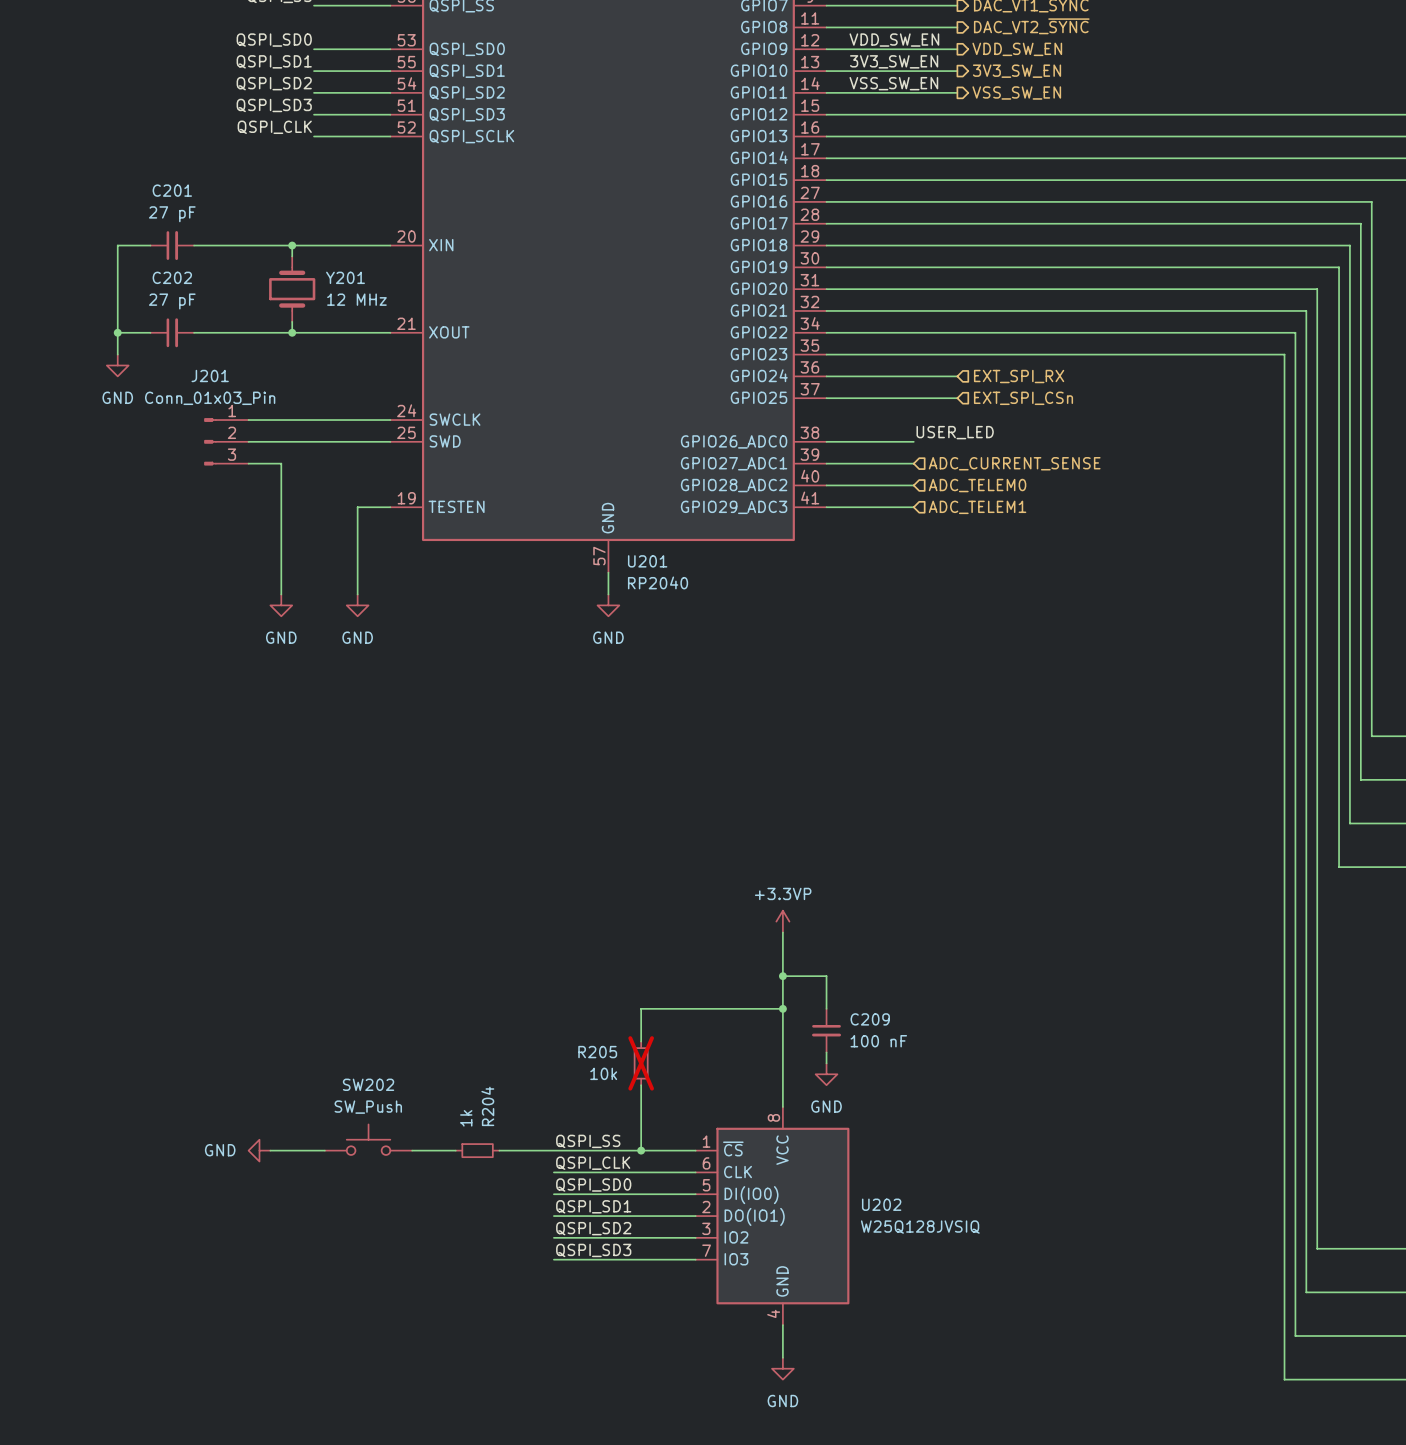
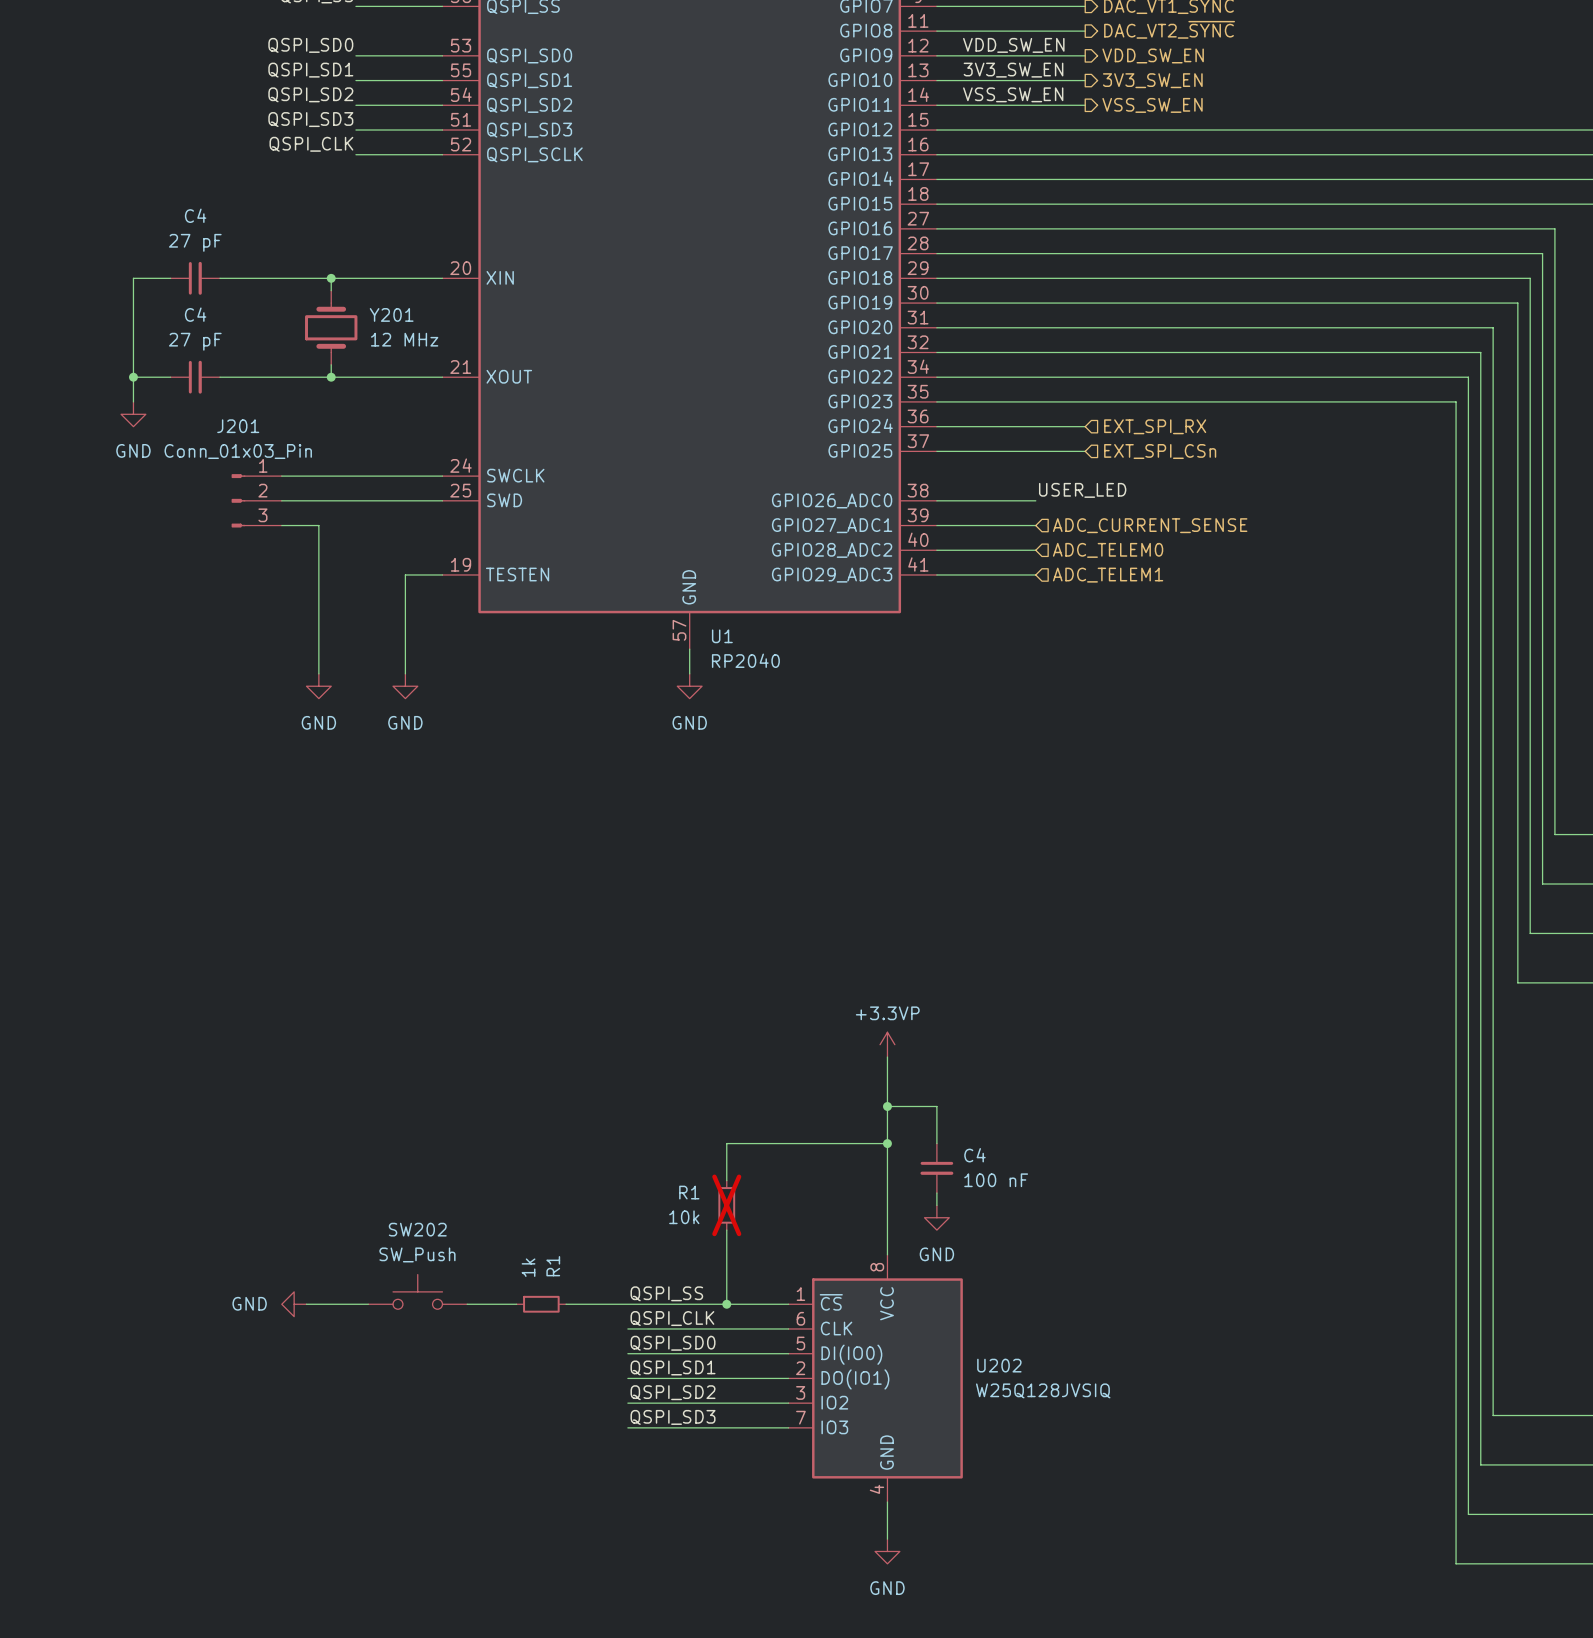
C201 name: C201 (172, 190) -> C4 (195, 215)
C202 name: C202 (172, 277) -> C4 (195, 314)
U201 name: U201 (647, 561) -> U1 (722, 636)
C209 name: C209 (870, 1019) -> C4 (974, 1155)
R205 name: R205 (597, 1052) -> R1 (689, 1192)
R204 name: R204 (487, 1106) -> R1 (553, 1266)

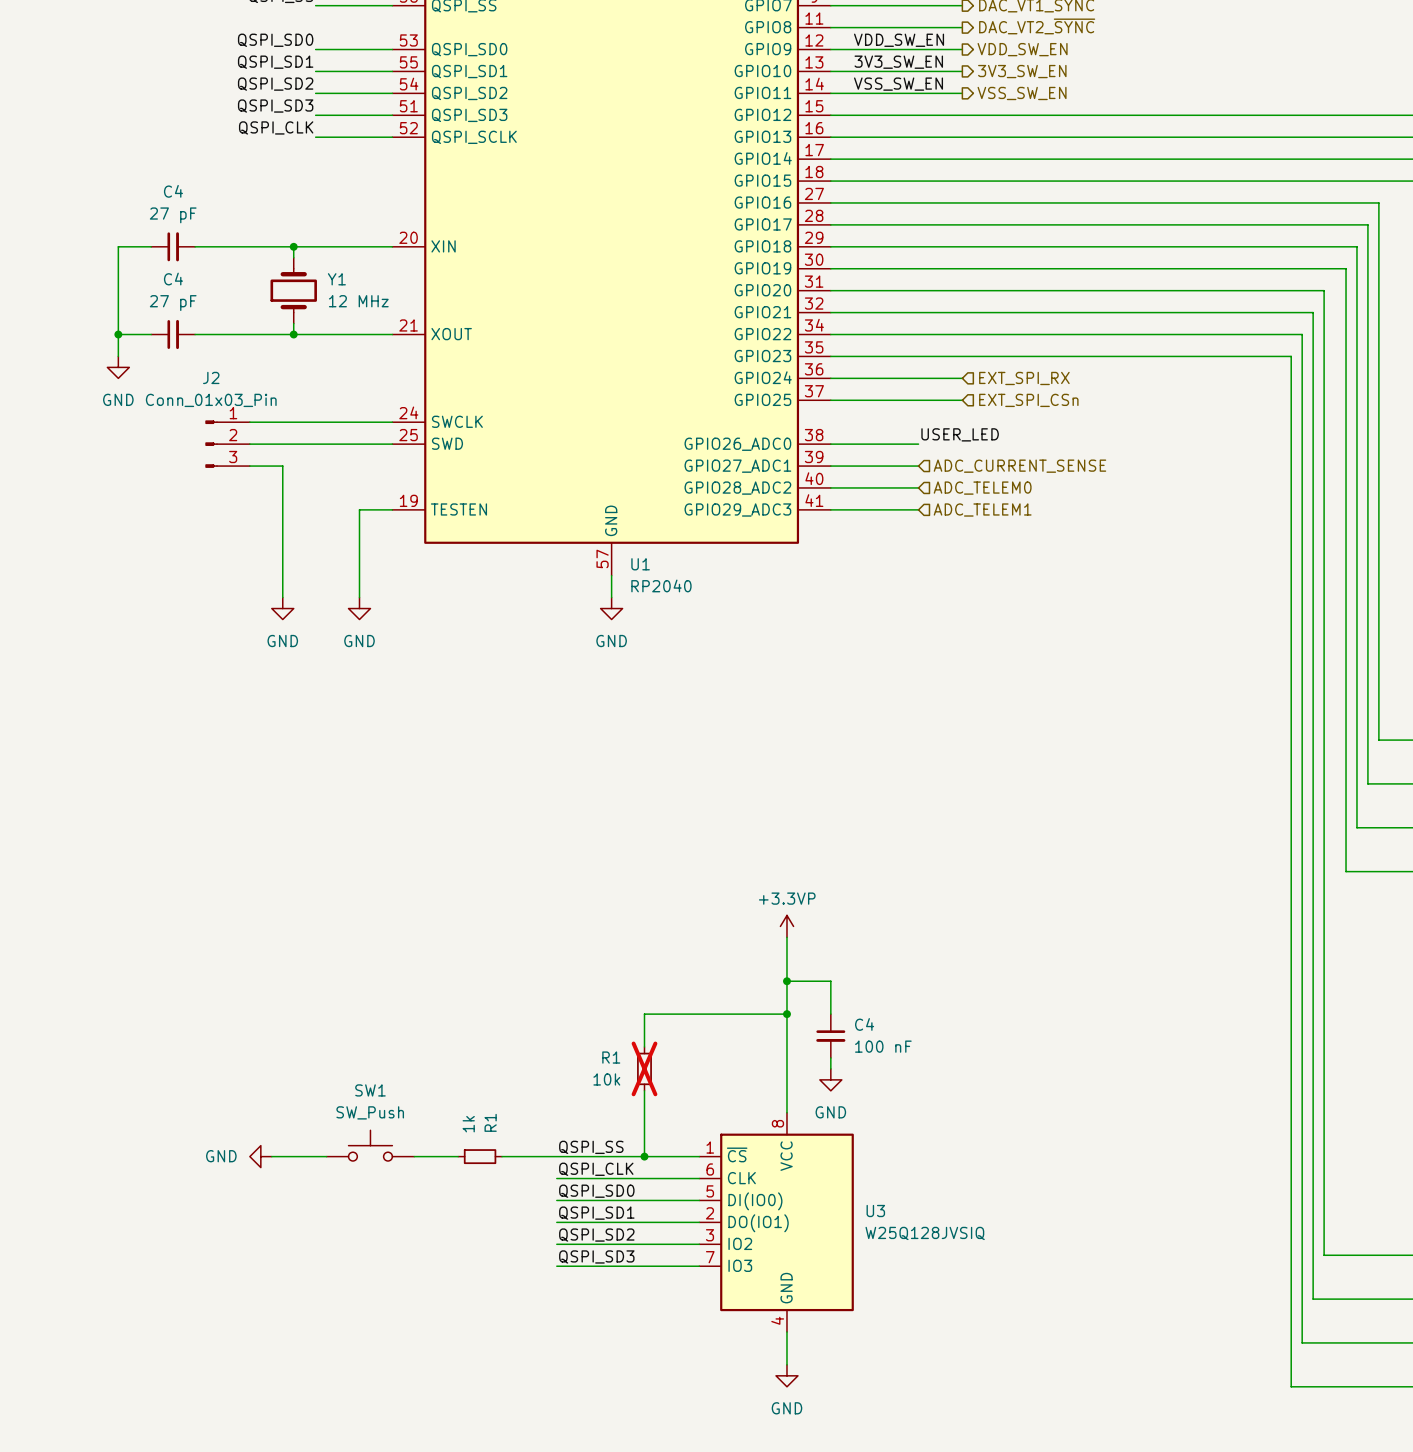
Y201 name: Y201 (391, 314) -> Y1 (336, 279)
J201 name: J201 (238, 426) -> J2 (211, 377)
SW202 name: SW202 (417, 1229) -> SW1 (370, 1090)
U202 name: U202 (999, 1365) -> U3 (875, 1211)

